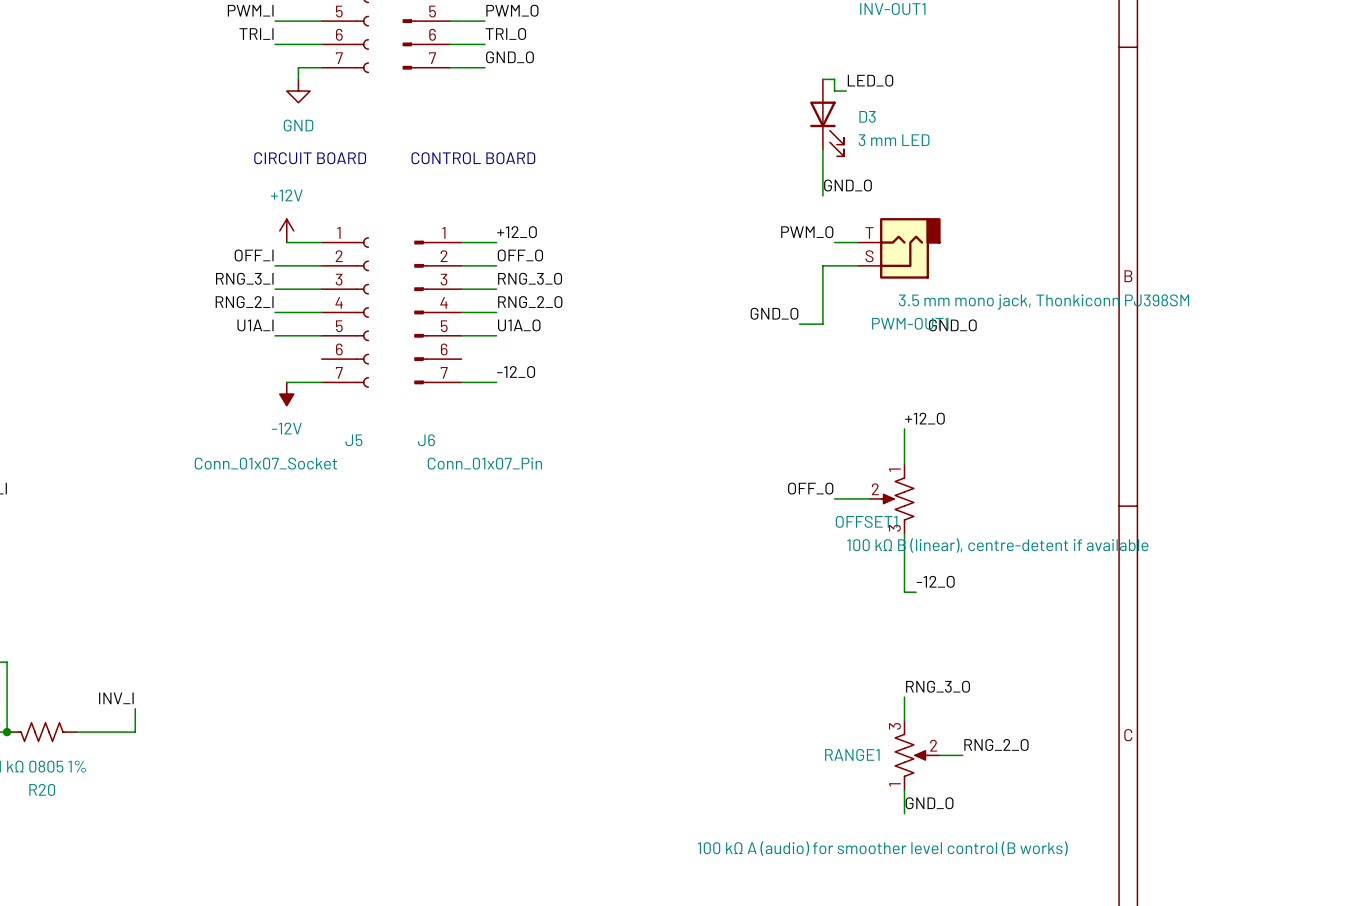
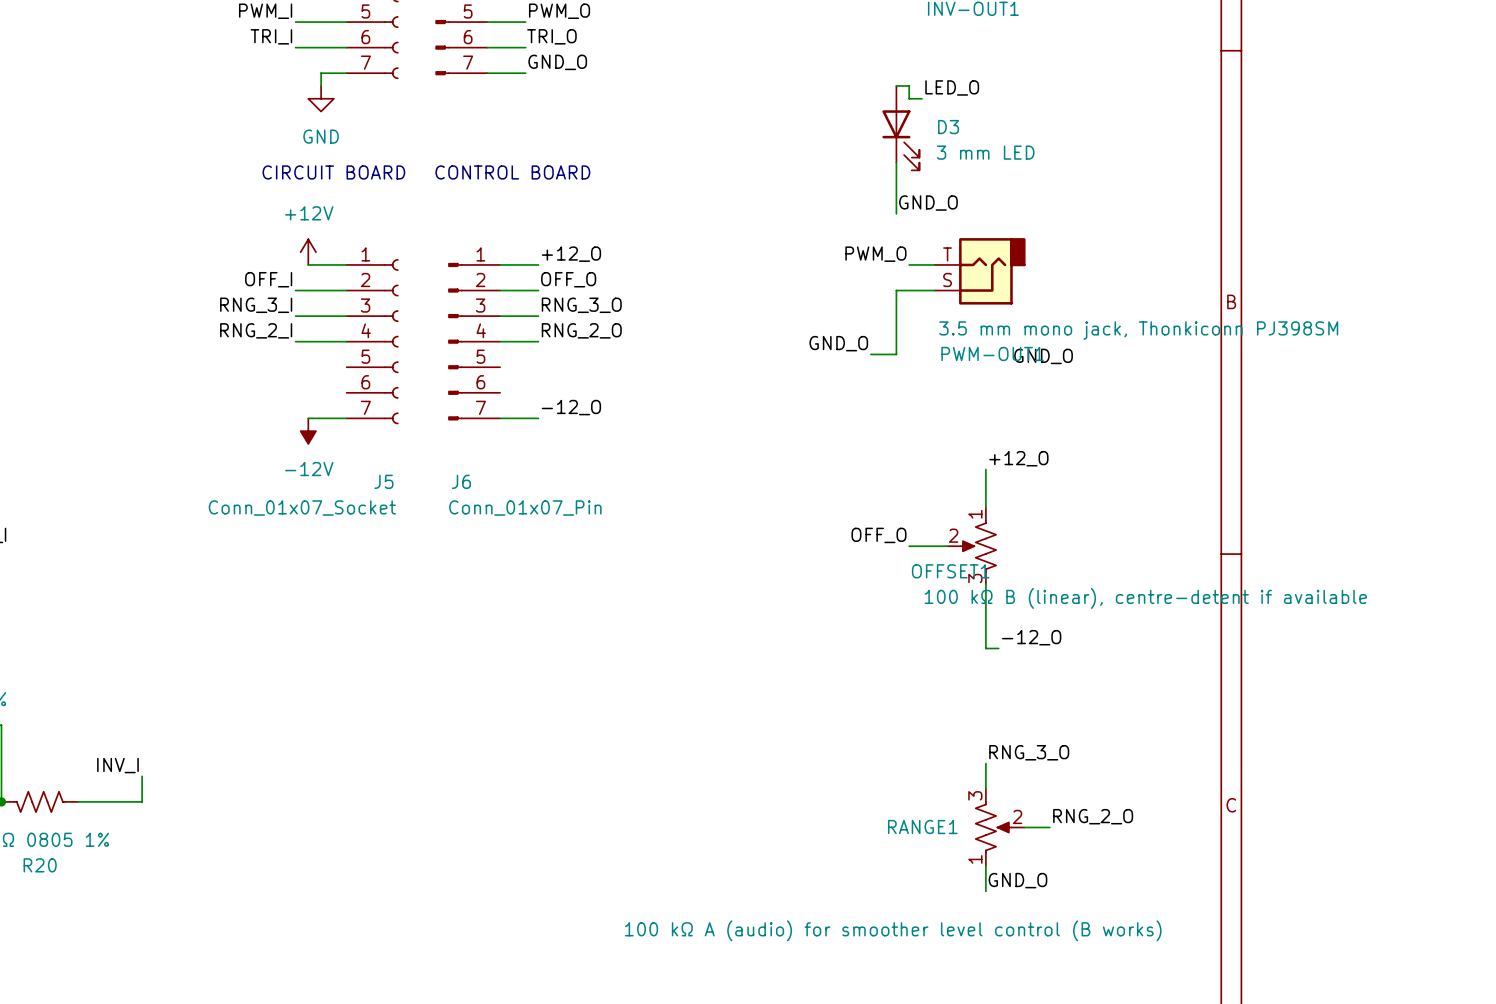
label: U1A_I (255, 325) -> none
label: U1A_O (519, 325) -> none
wire: (275, 335) (321, 335) -> none
wire: (461, 335) (496, 335) -> none

